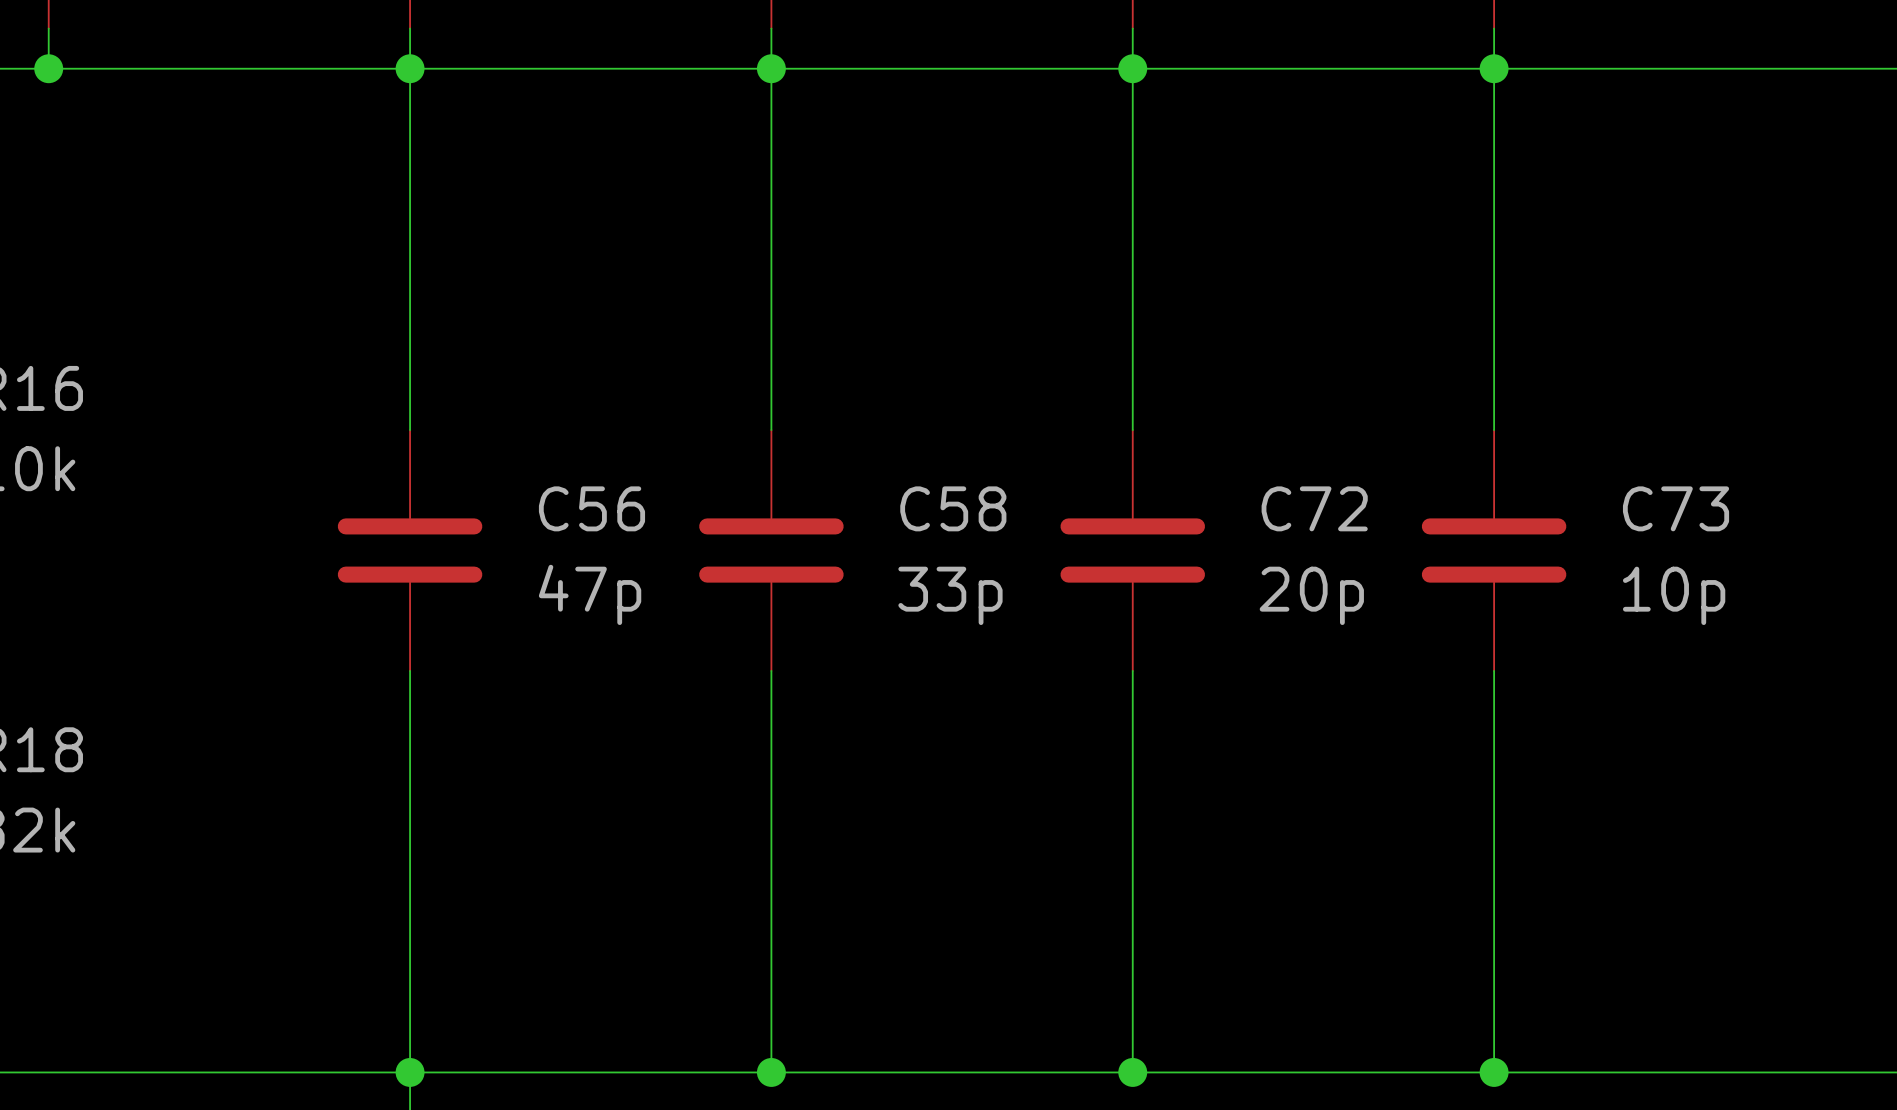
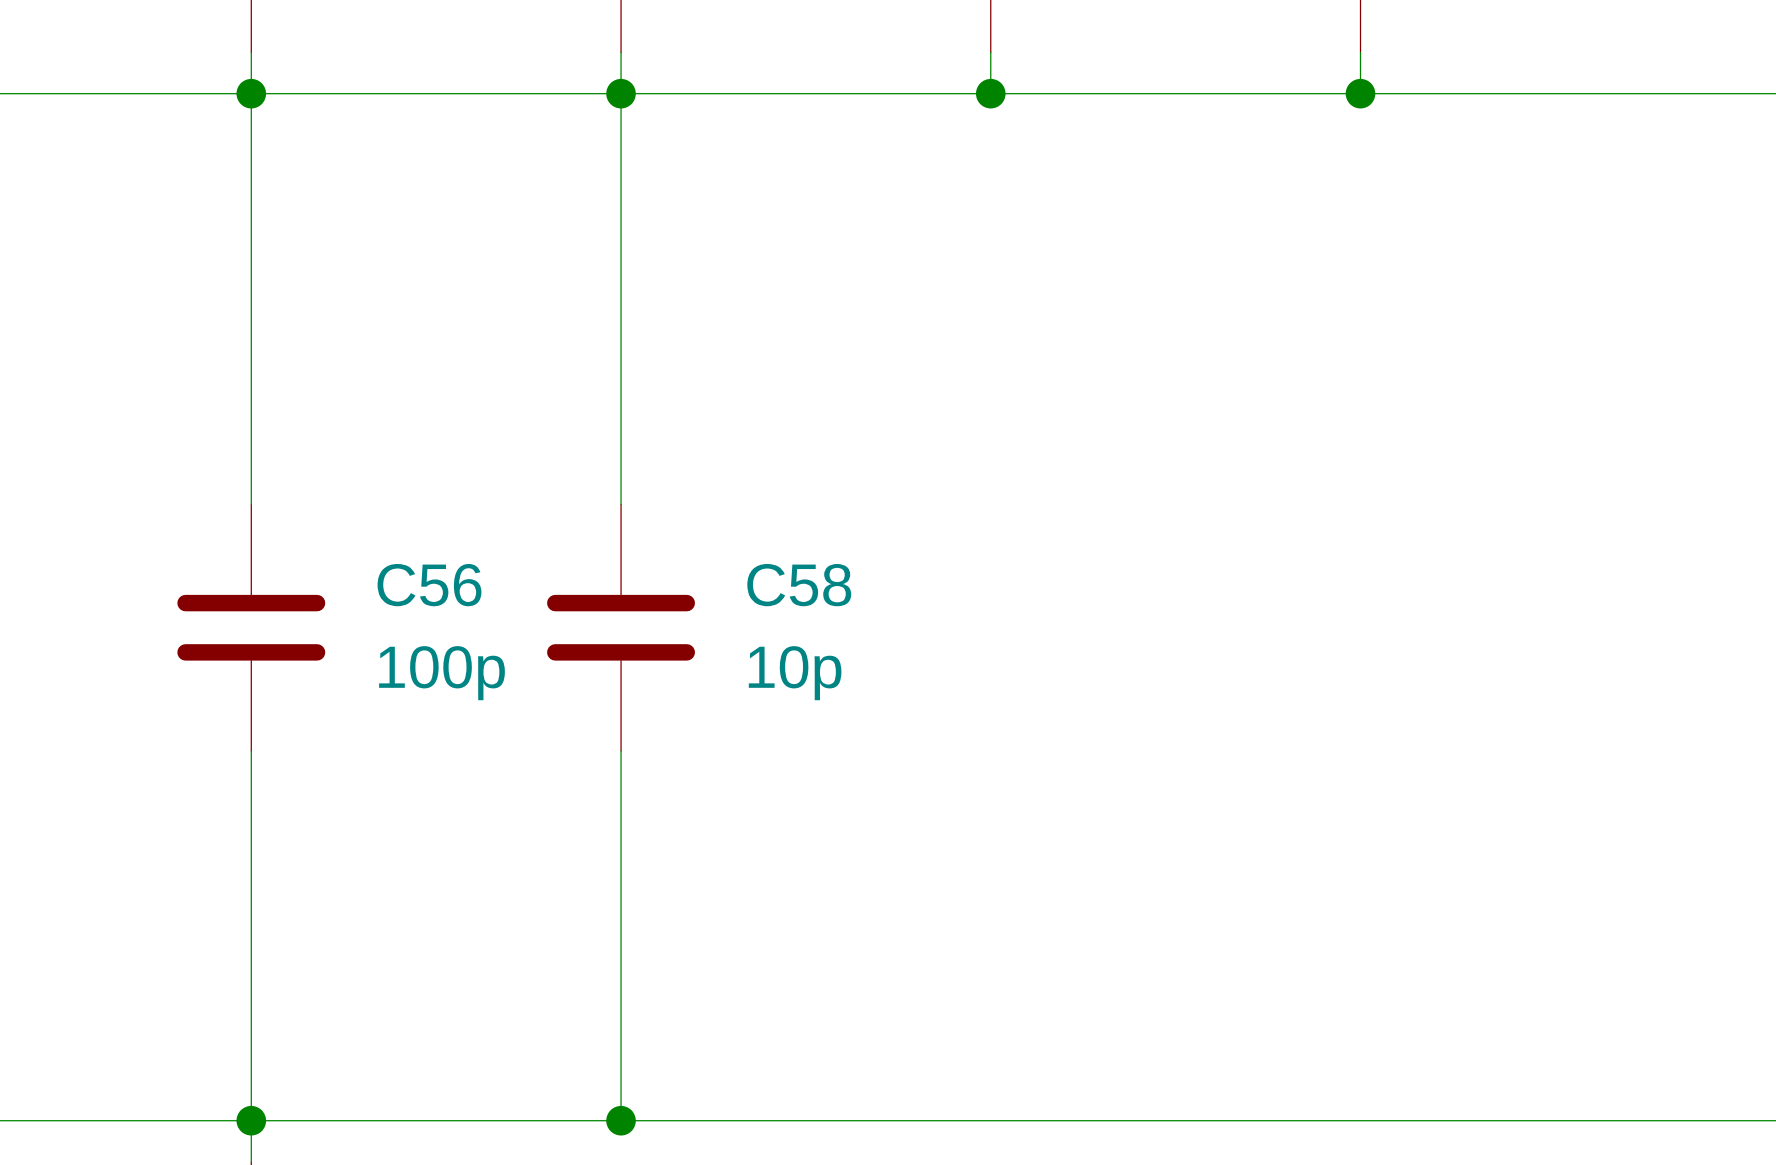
wire: (1132, 68) (1132, 430) -> none
wire: (1494, 68) (1494, 430) -> none
C56 position: (410, 550) -> (251, 627)
C58 position: (771, 550) -> (621, 627)
C72: 20p (1132, 550) -> none
C73: 10p (1494, 550) -> none
C56 value: 47p (590, 594) -> 100p (441, 673)
C58 value: 33p (950, 595) -> 10p (795, 673)
wire: (1132, 670) (1132, 1072) -> none
wire: (1494, 670) (1494, 1072) -> none
junction: (1132, 1072) -> none
junction: (1494, 1072) -> none

